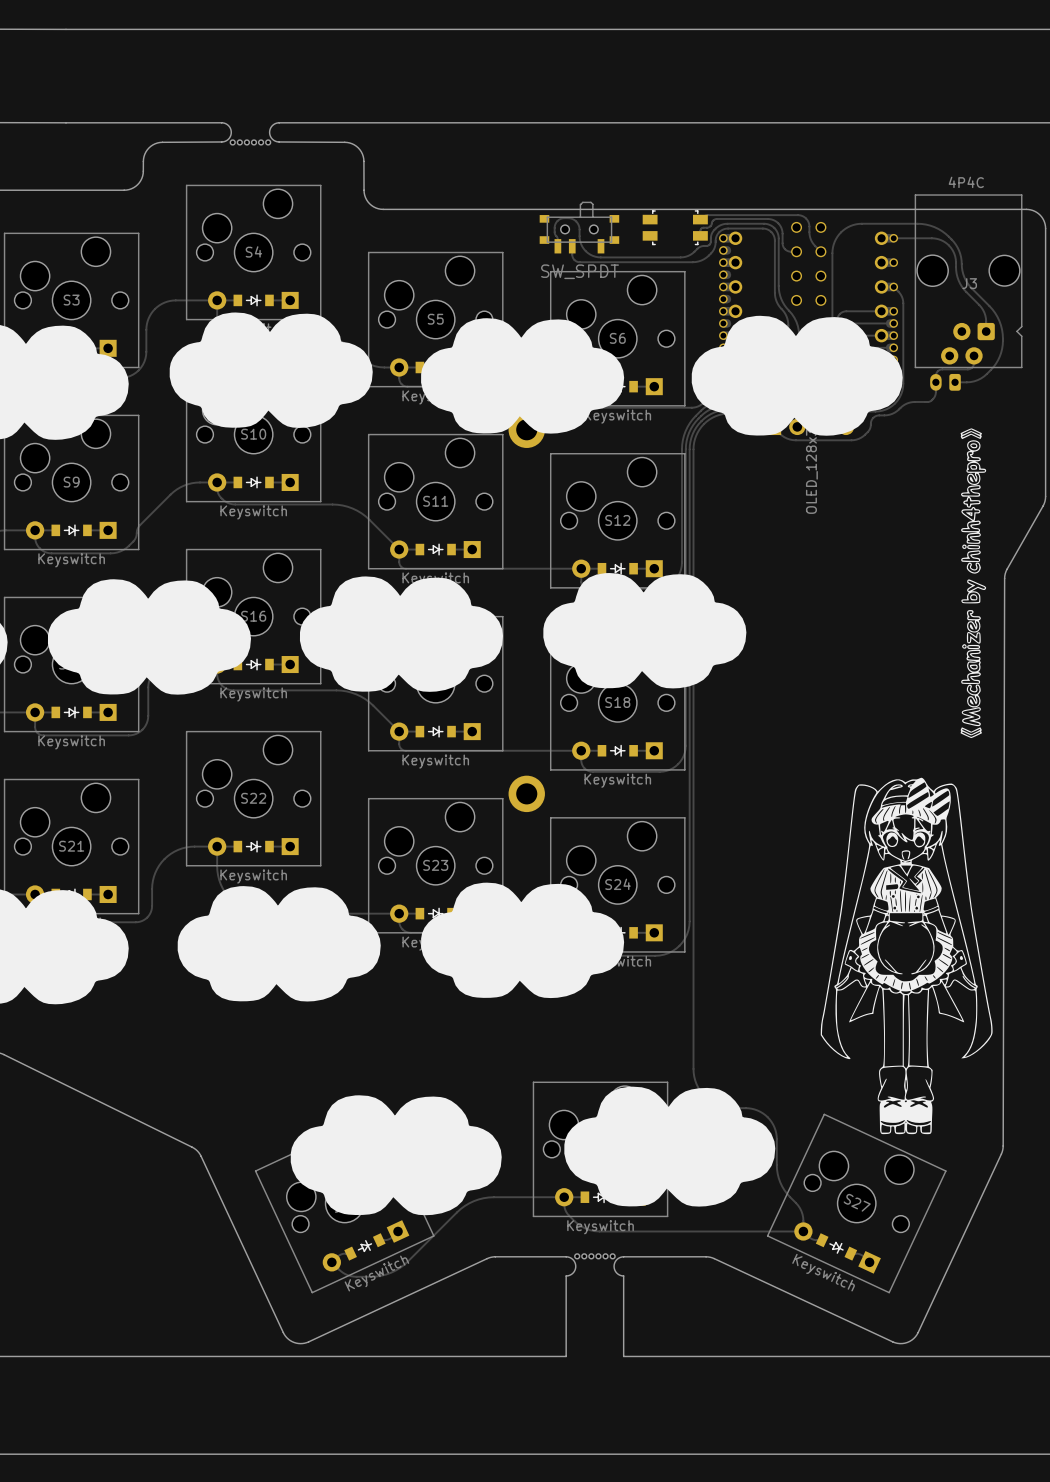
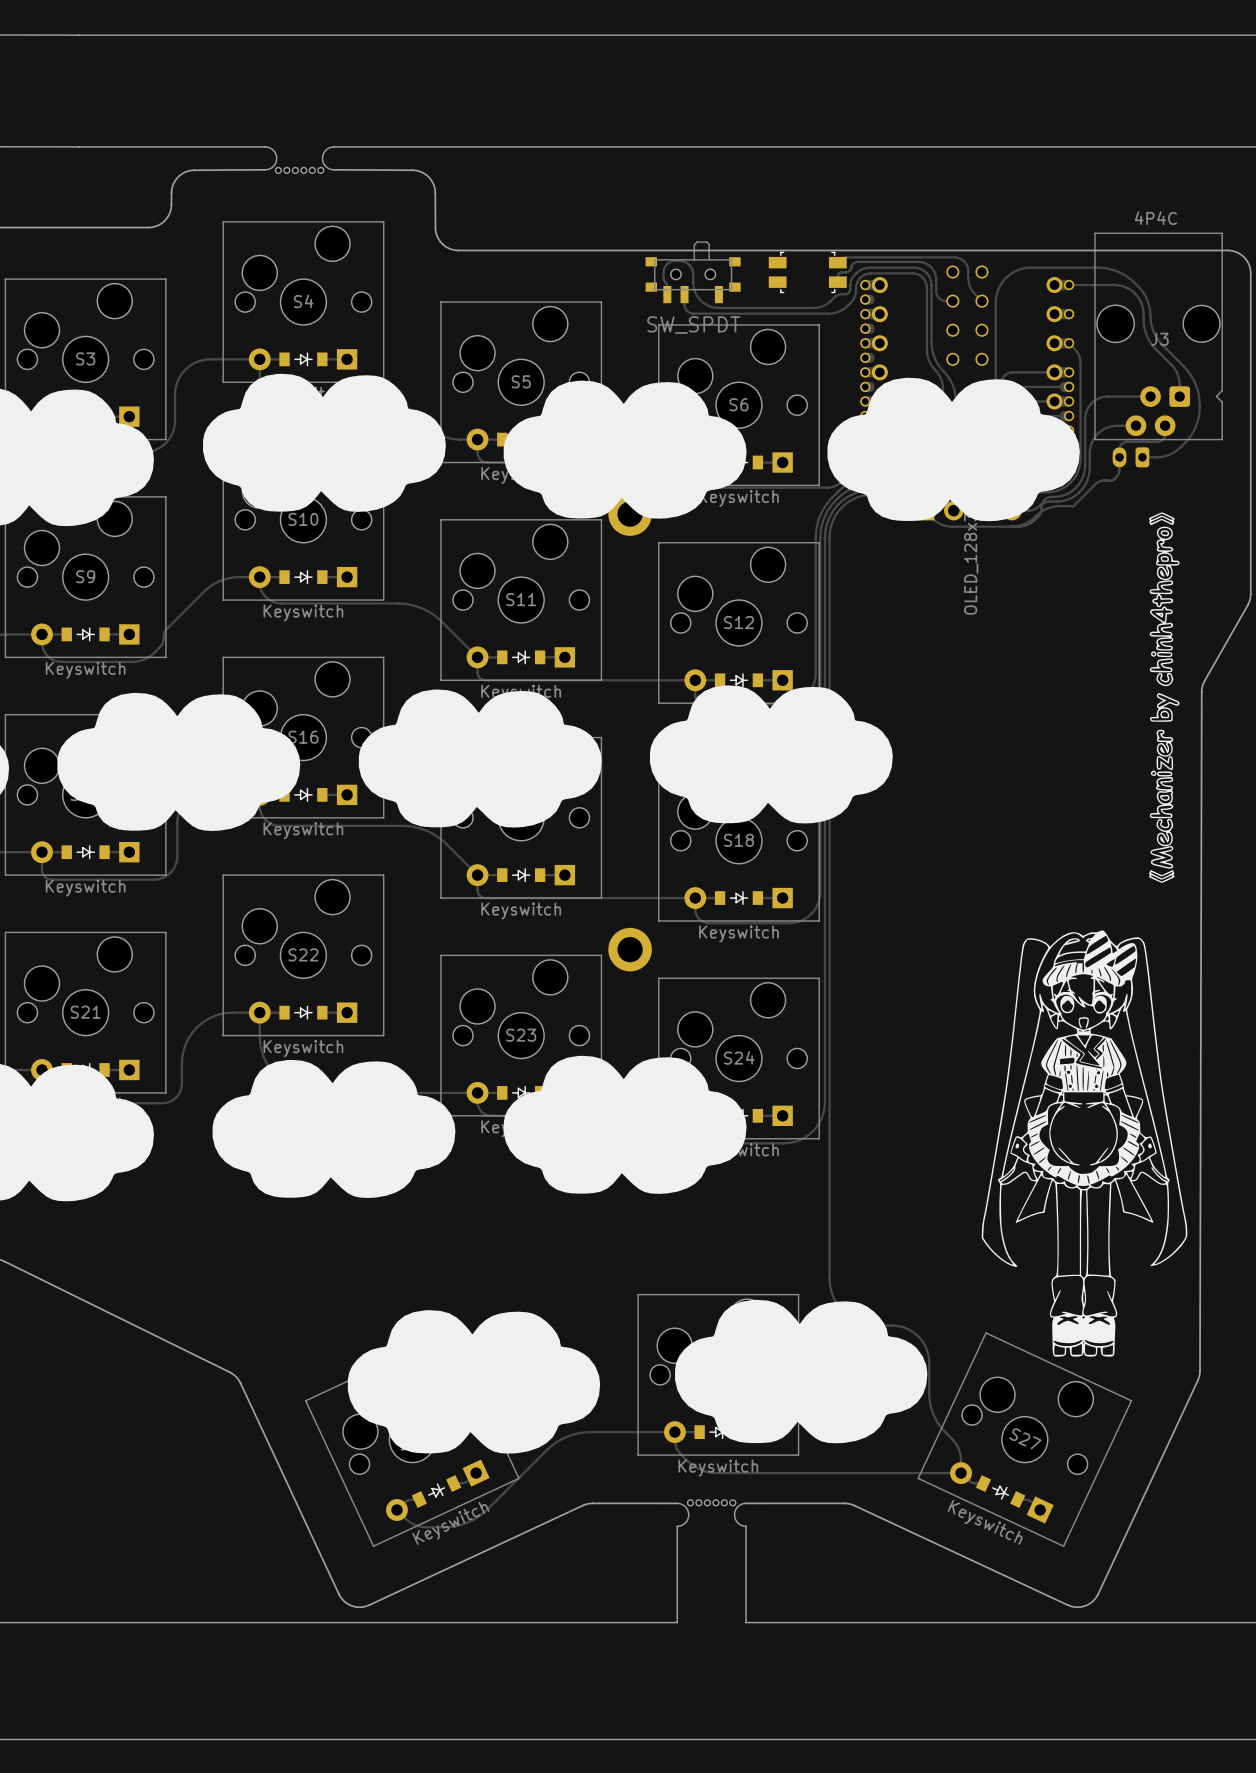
track: none -> (1150, 396) (1105, 396) (1091, 403) (1085, 416) (1085, 465) (1082, 477) (1075, 487) (1069, 492) (1051, 496)
track: none -> (1136, 425) (1109, 426) (1095, 435) (1090, 447) (1088, 477) (1084, 486) (1076, 494) (1065, 500) (1045, 502) (1032, 510) (1011, 510)
track: (922, 401) (908, 402) (892, 413) (879, 415) -> (1102, 480) (1096, 483) (1073, 506) (1050, 507) (1024, 524) (1010, 526)

